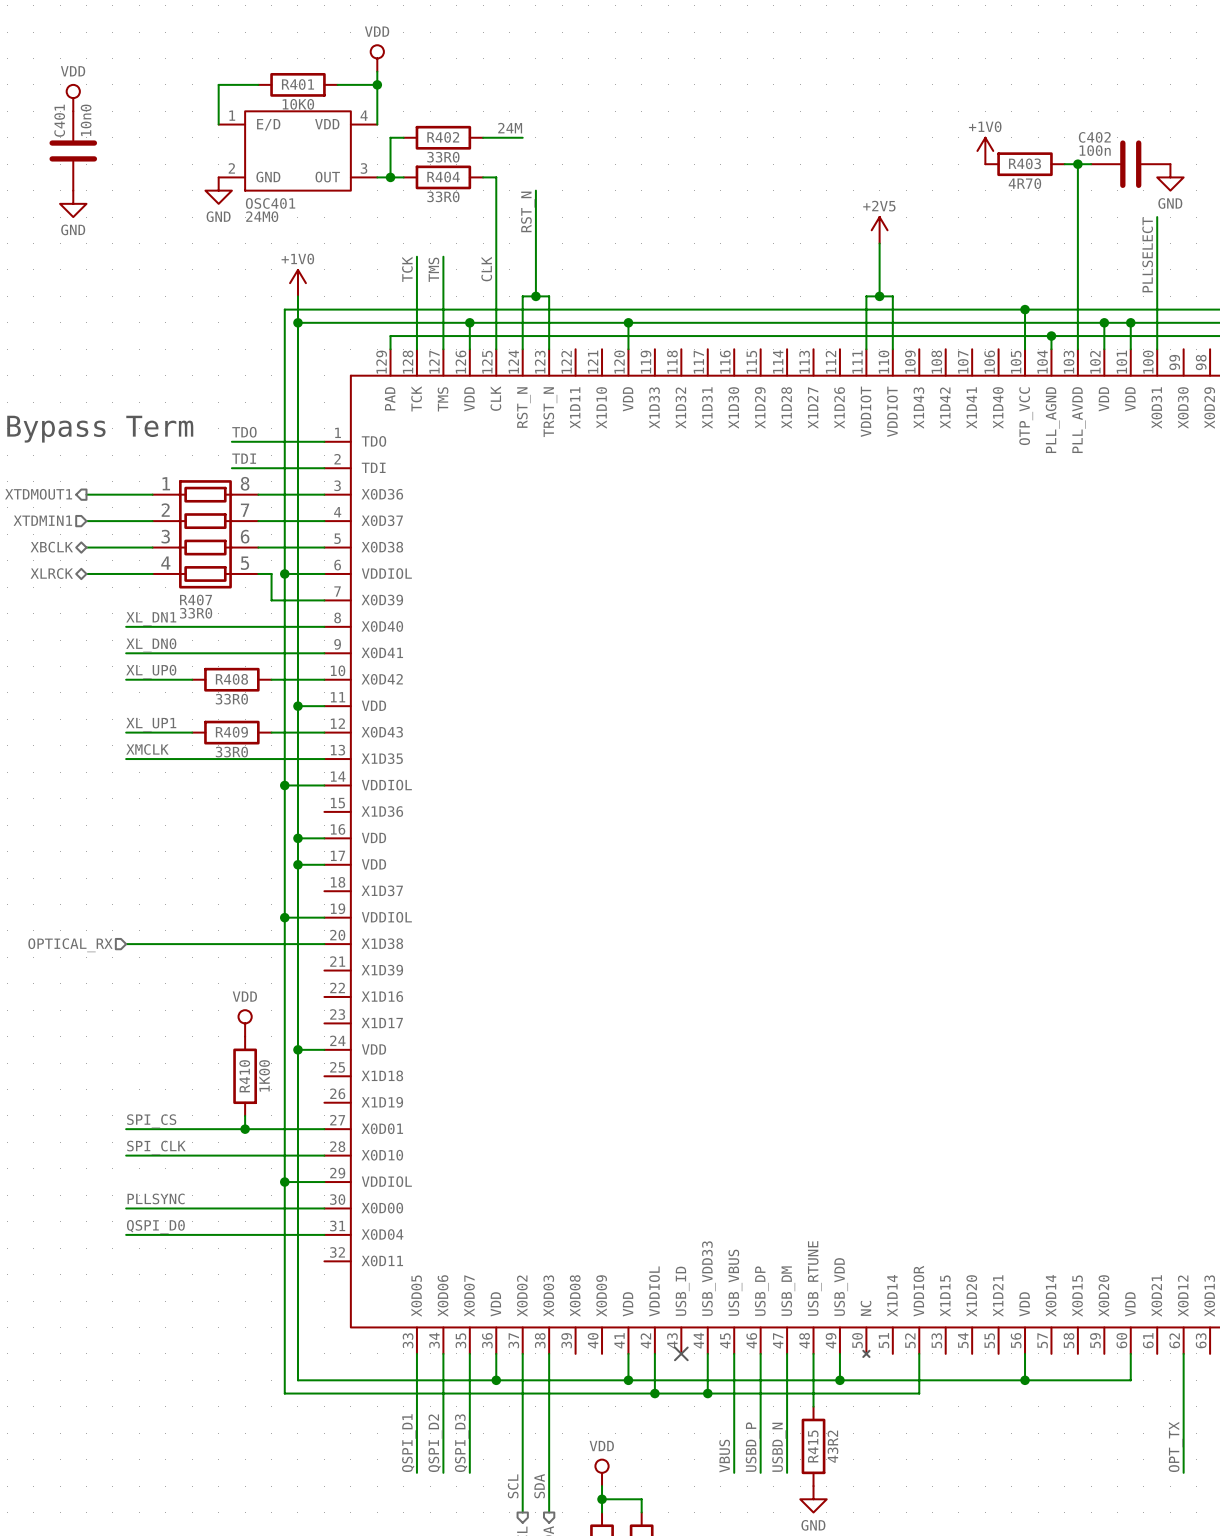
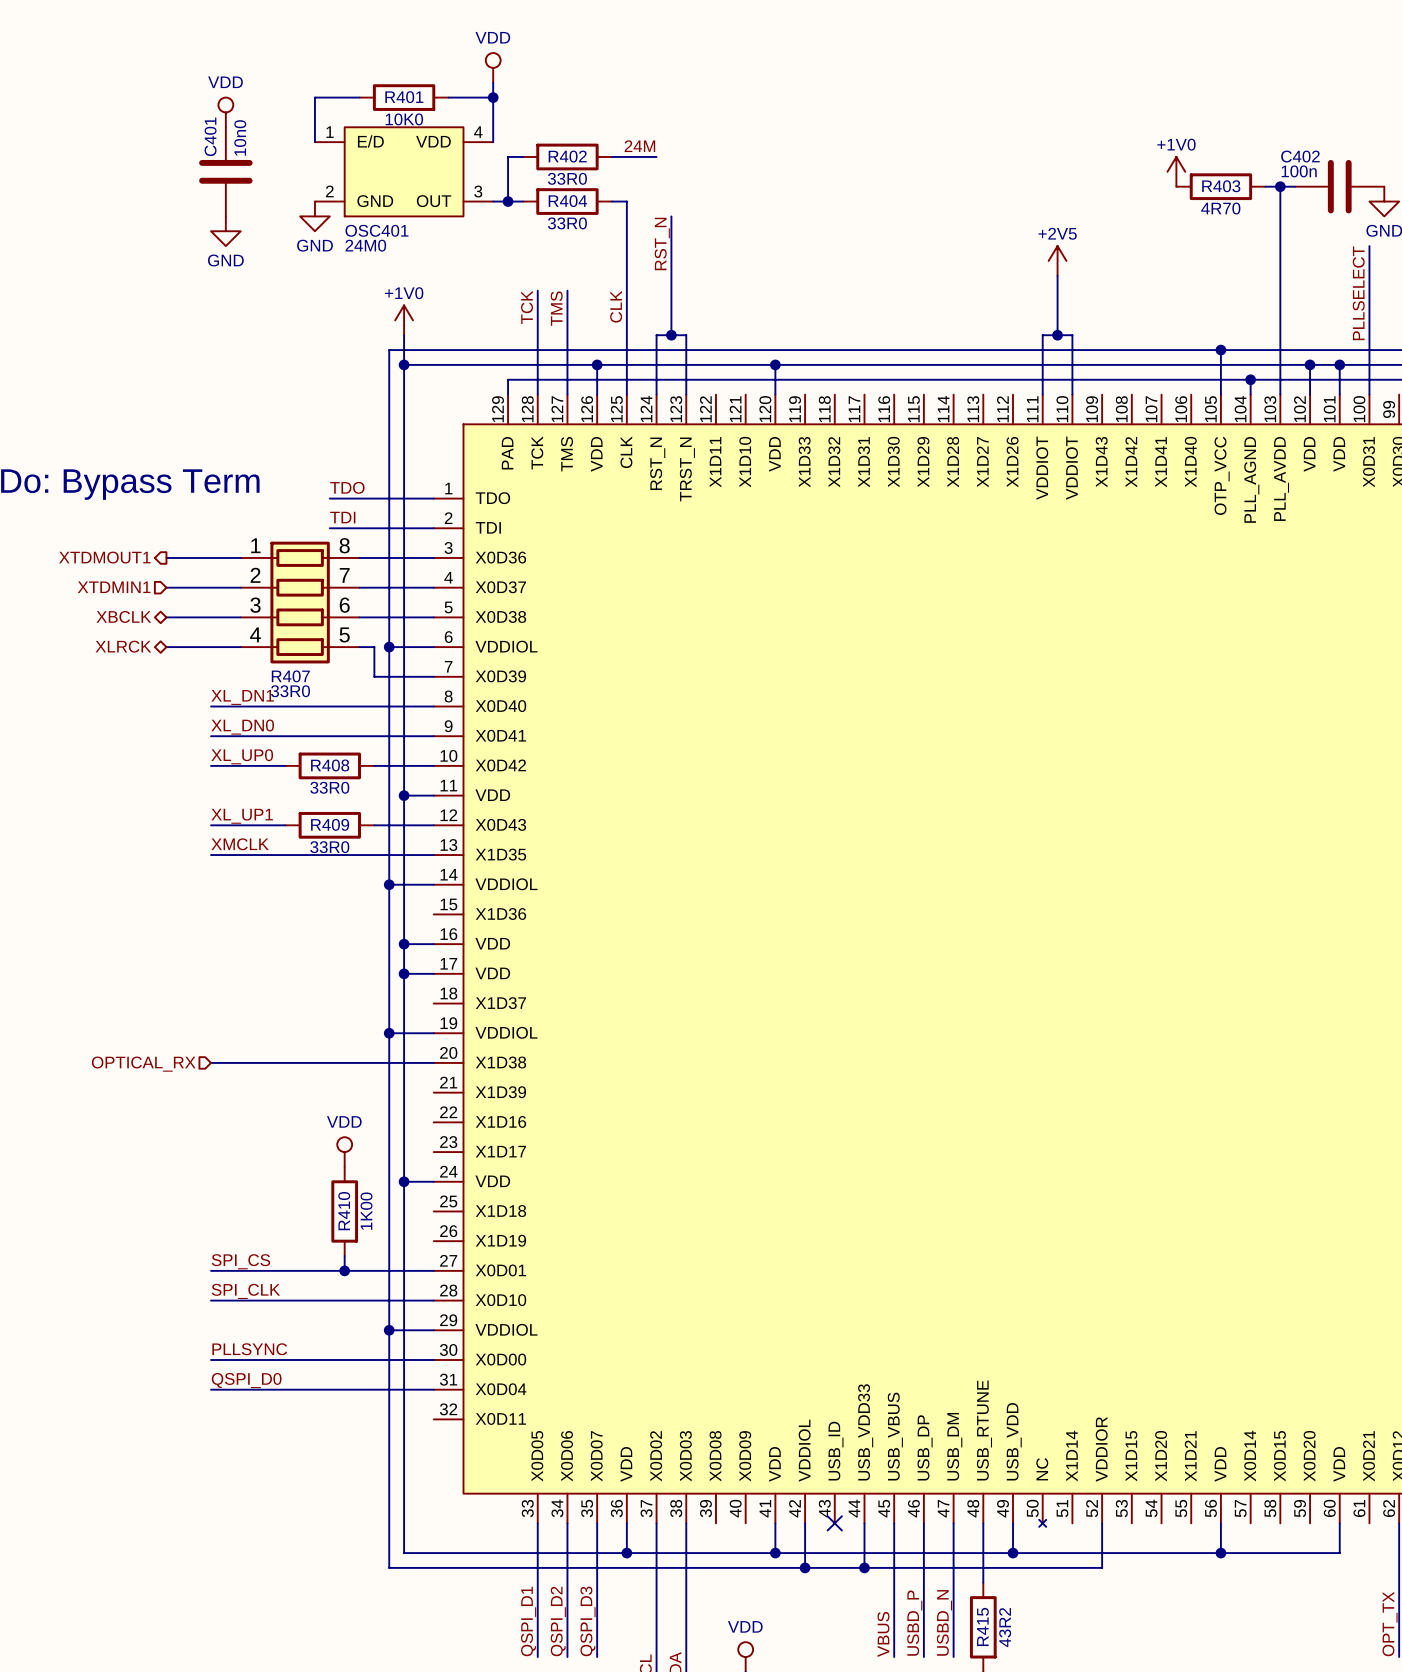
power symbol position: VDD (73, 98) -> VDD (225, 112)
C401 position: (73, 150) -> (225, 171)
power symbol position: GND (73, 203) -> GND (225, 231)

